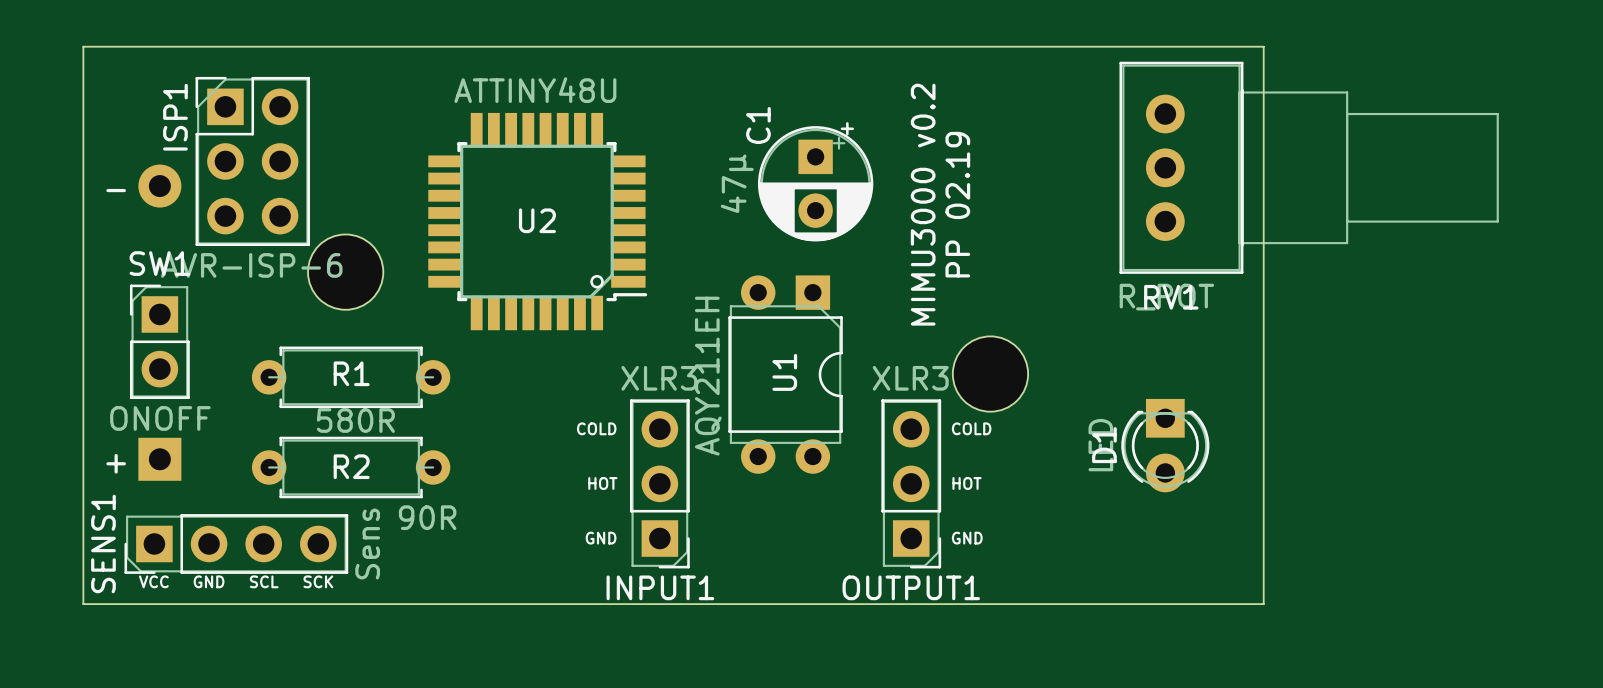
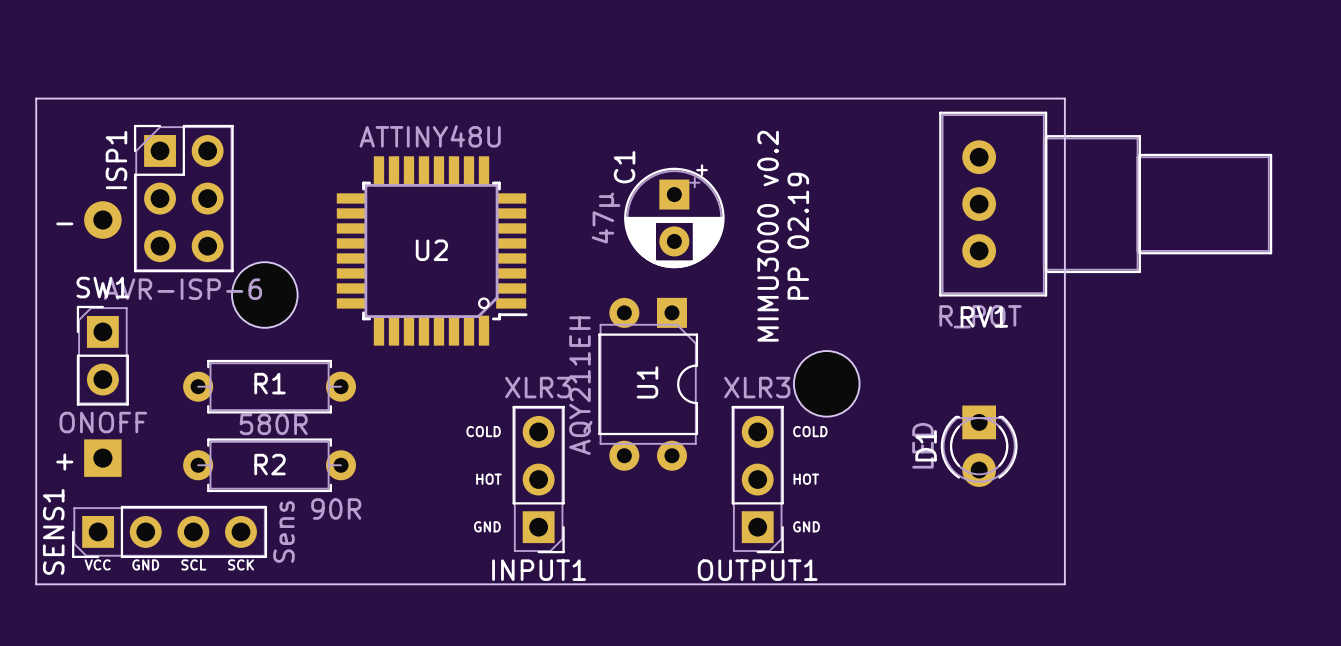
RV1 footprint: [1119, 61, 1499, 274] -> [939, 111, 1273, 297]

